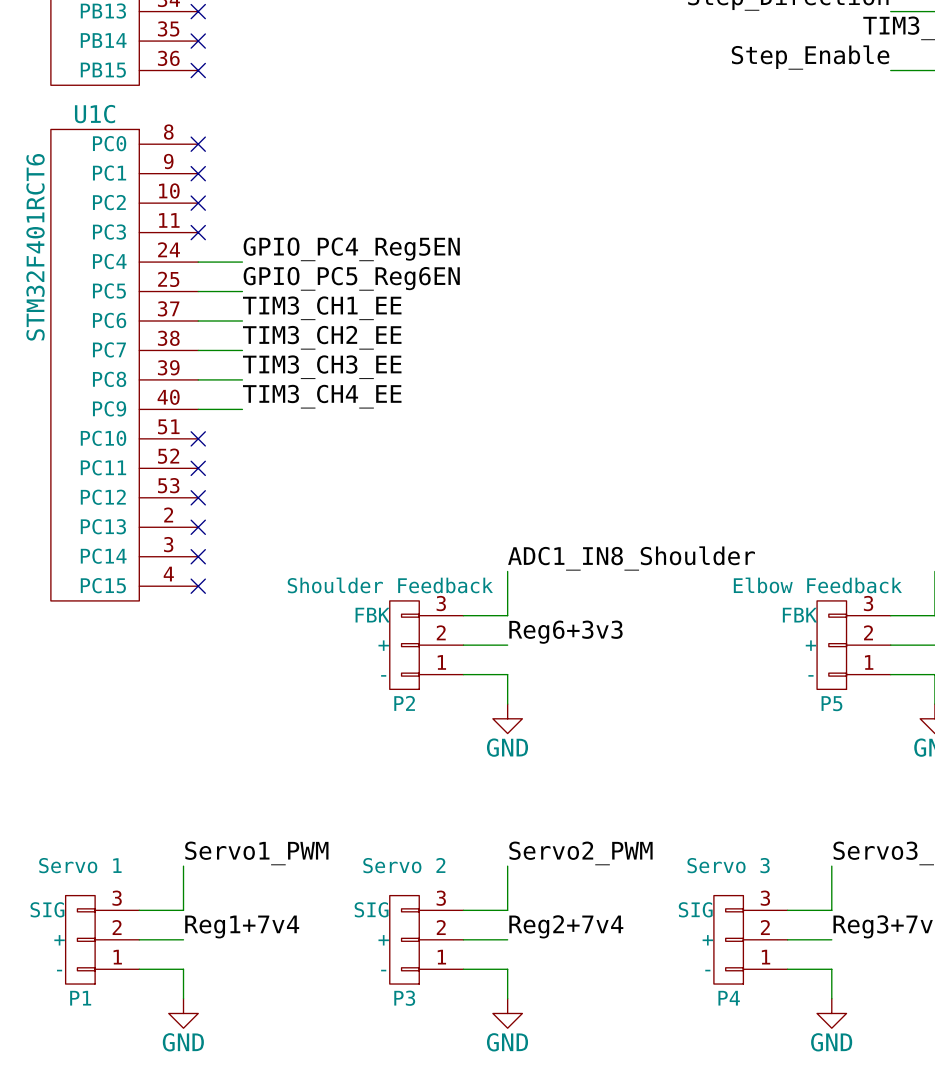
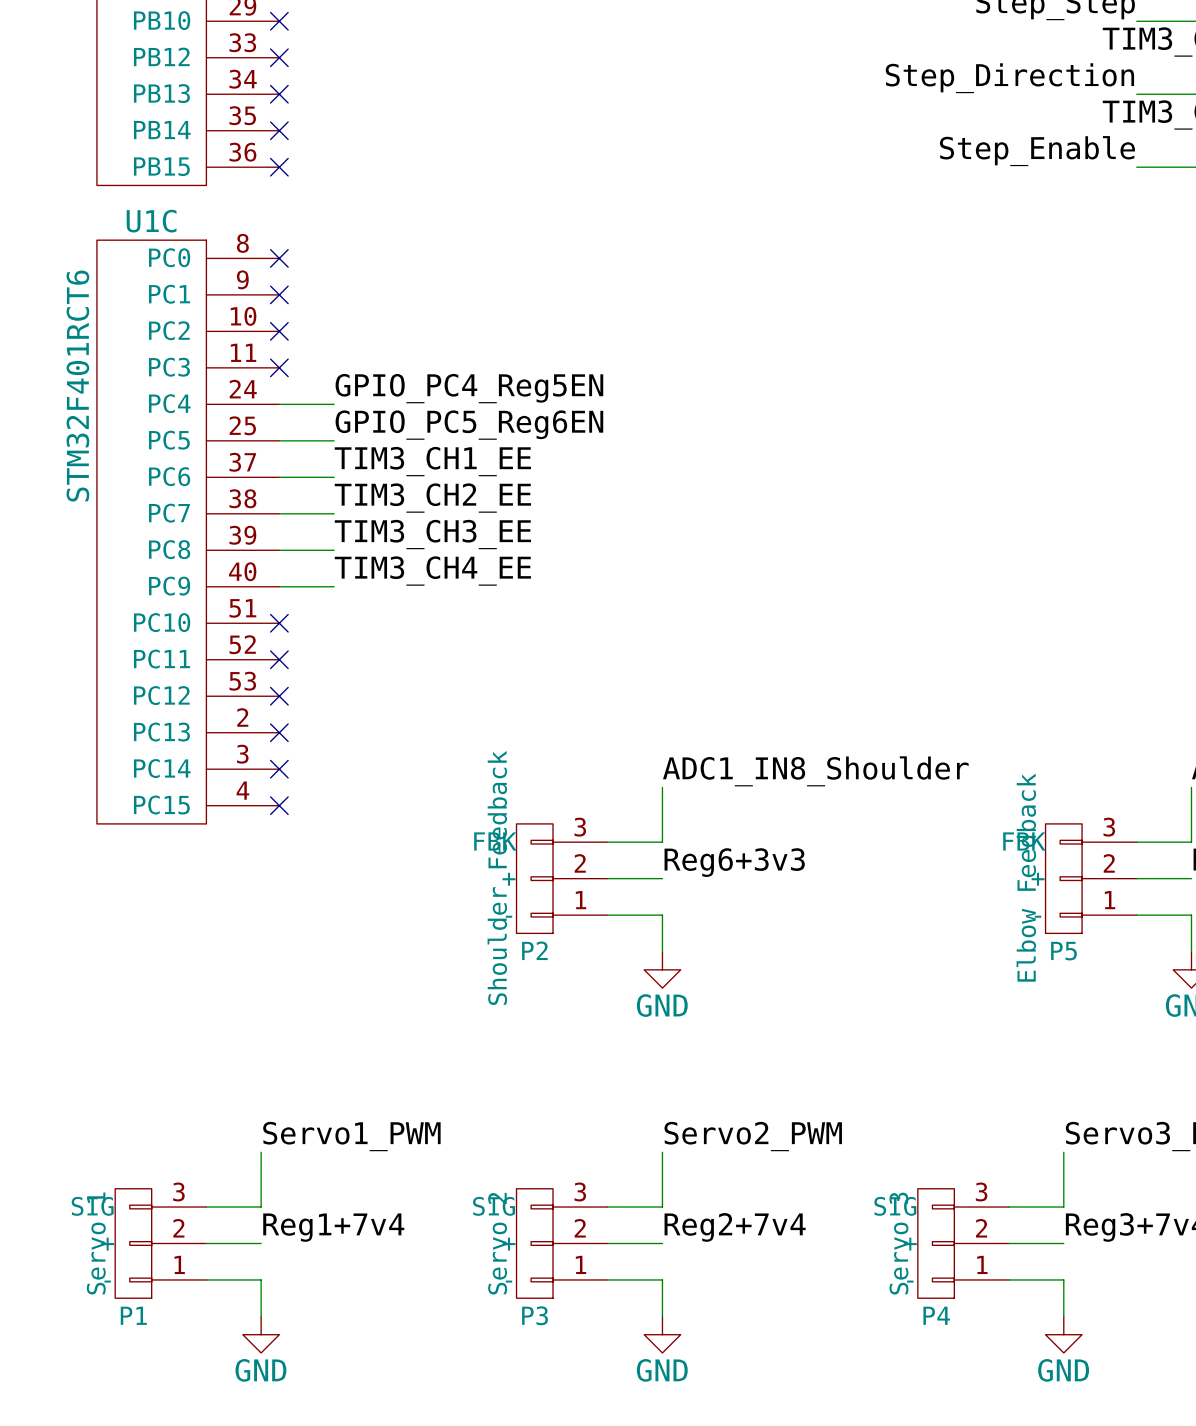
P2 value rotation: 0° (390, 585) -> 90° counterclockwise (497, 877)
P5 value rotation: 0° (817, 585) -> 90° counterclockwise (1026, 877)
P1 value rotation: 0° (80, 865) -> 90° counterclockwise (96, 1243)
P3 value rotation: 0° (404, 865) -> 90° counterclockwise (497, 1243)
P4 value rotation: 0° (728, 865) -> 90° counterclockwise (898, 1243)

